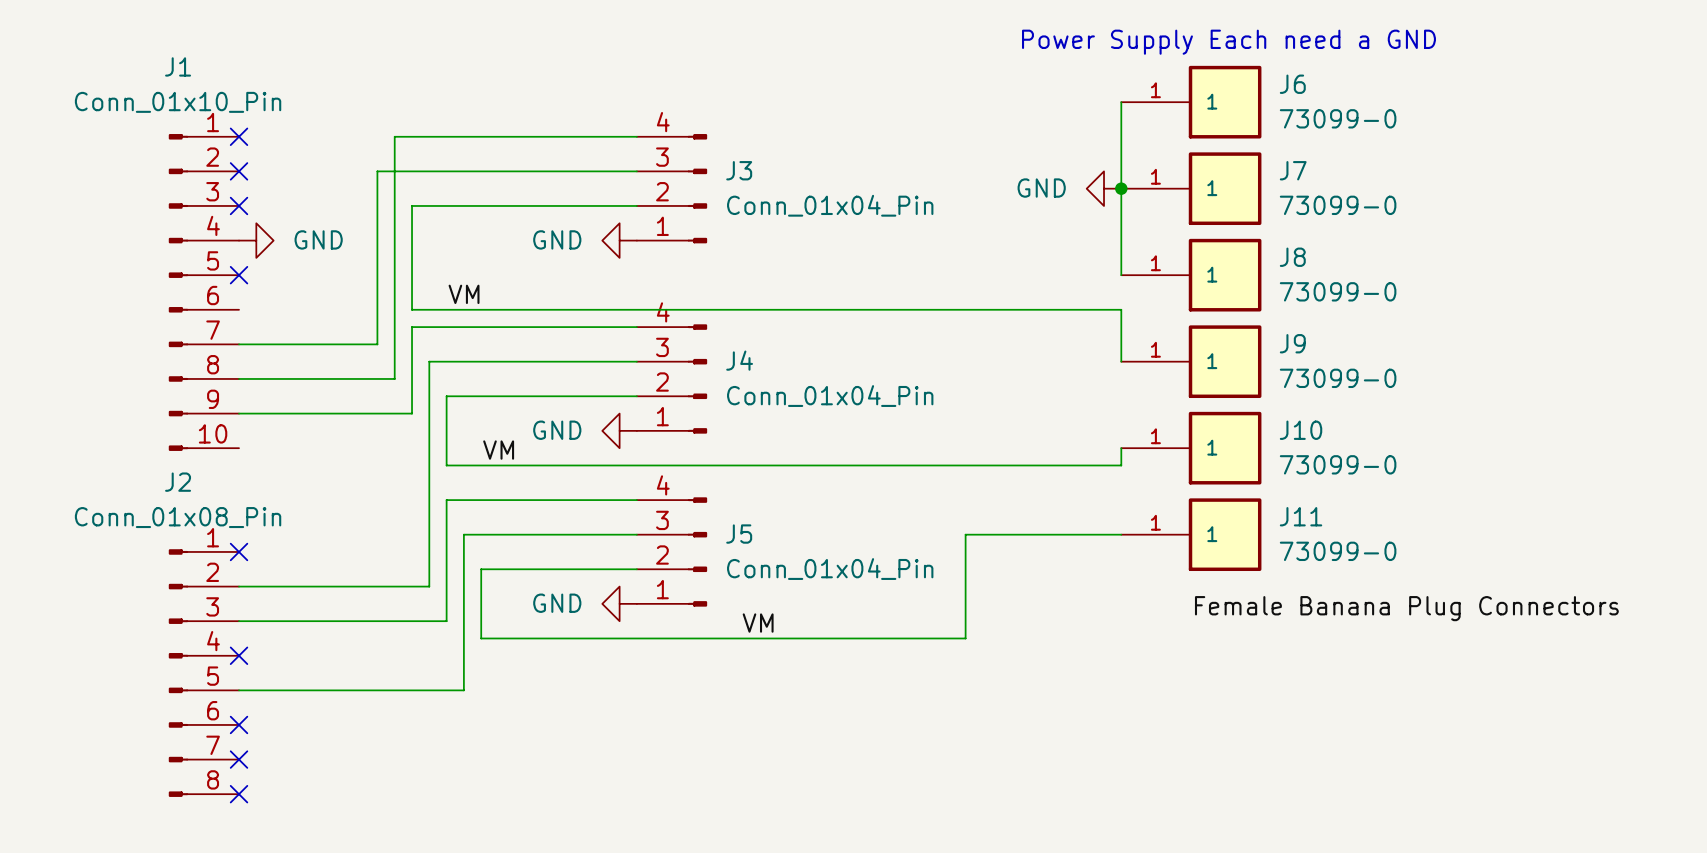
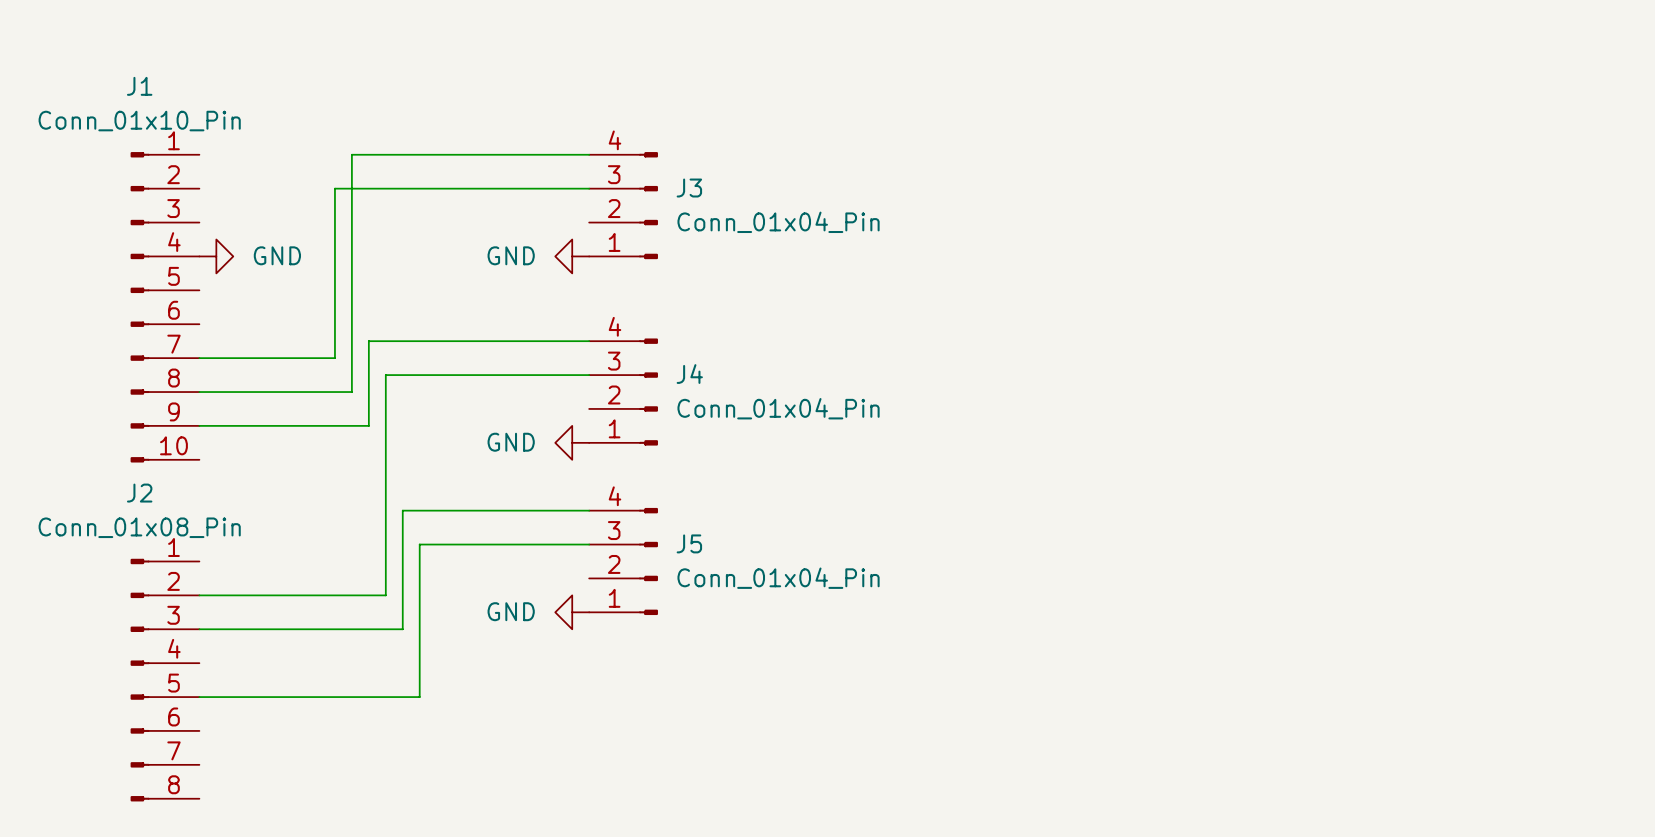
text: Power Supply Each need a GND (1228, 42) -> none
wire: (1121, 102) (1121, 275) -> none
J6: 73099-0 (1191, 102) -> none
no-connect mark: (239, 136) -> none
no-connect mark: (239, 171) -> none
power symbol: GND (1104, 188) -> none
junction: (1121, 188) -> none
J7: 73099-0 (1191, 188) -> none
no-connect mark: (239, 205) -> none
wire: (636, 205) (412, 205) (412, 309) (1121, 309) (1121, 361) -> none
no-connect mark: (239, 275) -> none
J8: 73099-0 (1191, 275) -> none
label: VM (464, 294) -> none
J9: 73099-0 (1191, 361) -> none
wire: (636, 396) (446, 396) (446, 465) (1121, 465) (1121, 448) -> none
J10: 73099-0 (1191, 448) -> none
label: VM (498, 450) -> none
wire: (1121, 534) (965, 534) (965, 638) (481, 638) (481, 569) (636, 569) -> none
J11: 73099-0 (1191, 534) -> none
no-connect mark: (239, 551) -> none
label: Female Banana Plug Connectors (1406, 608) -> none
label: VM (758, 623) -> none
no-connect mark: (239, 655) -> none
no-connect mark: (239, 724) -> none
no-connect mark: (239, 759) -> none
no-connect mark: (239, 794) -> none

